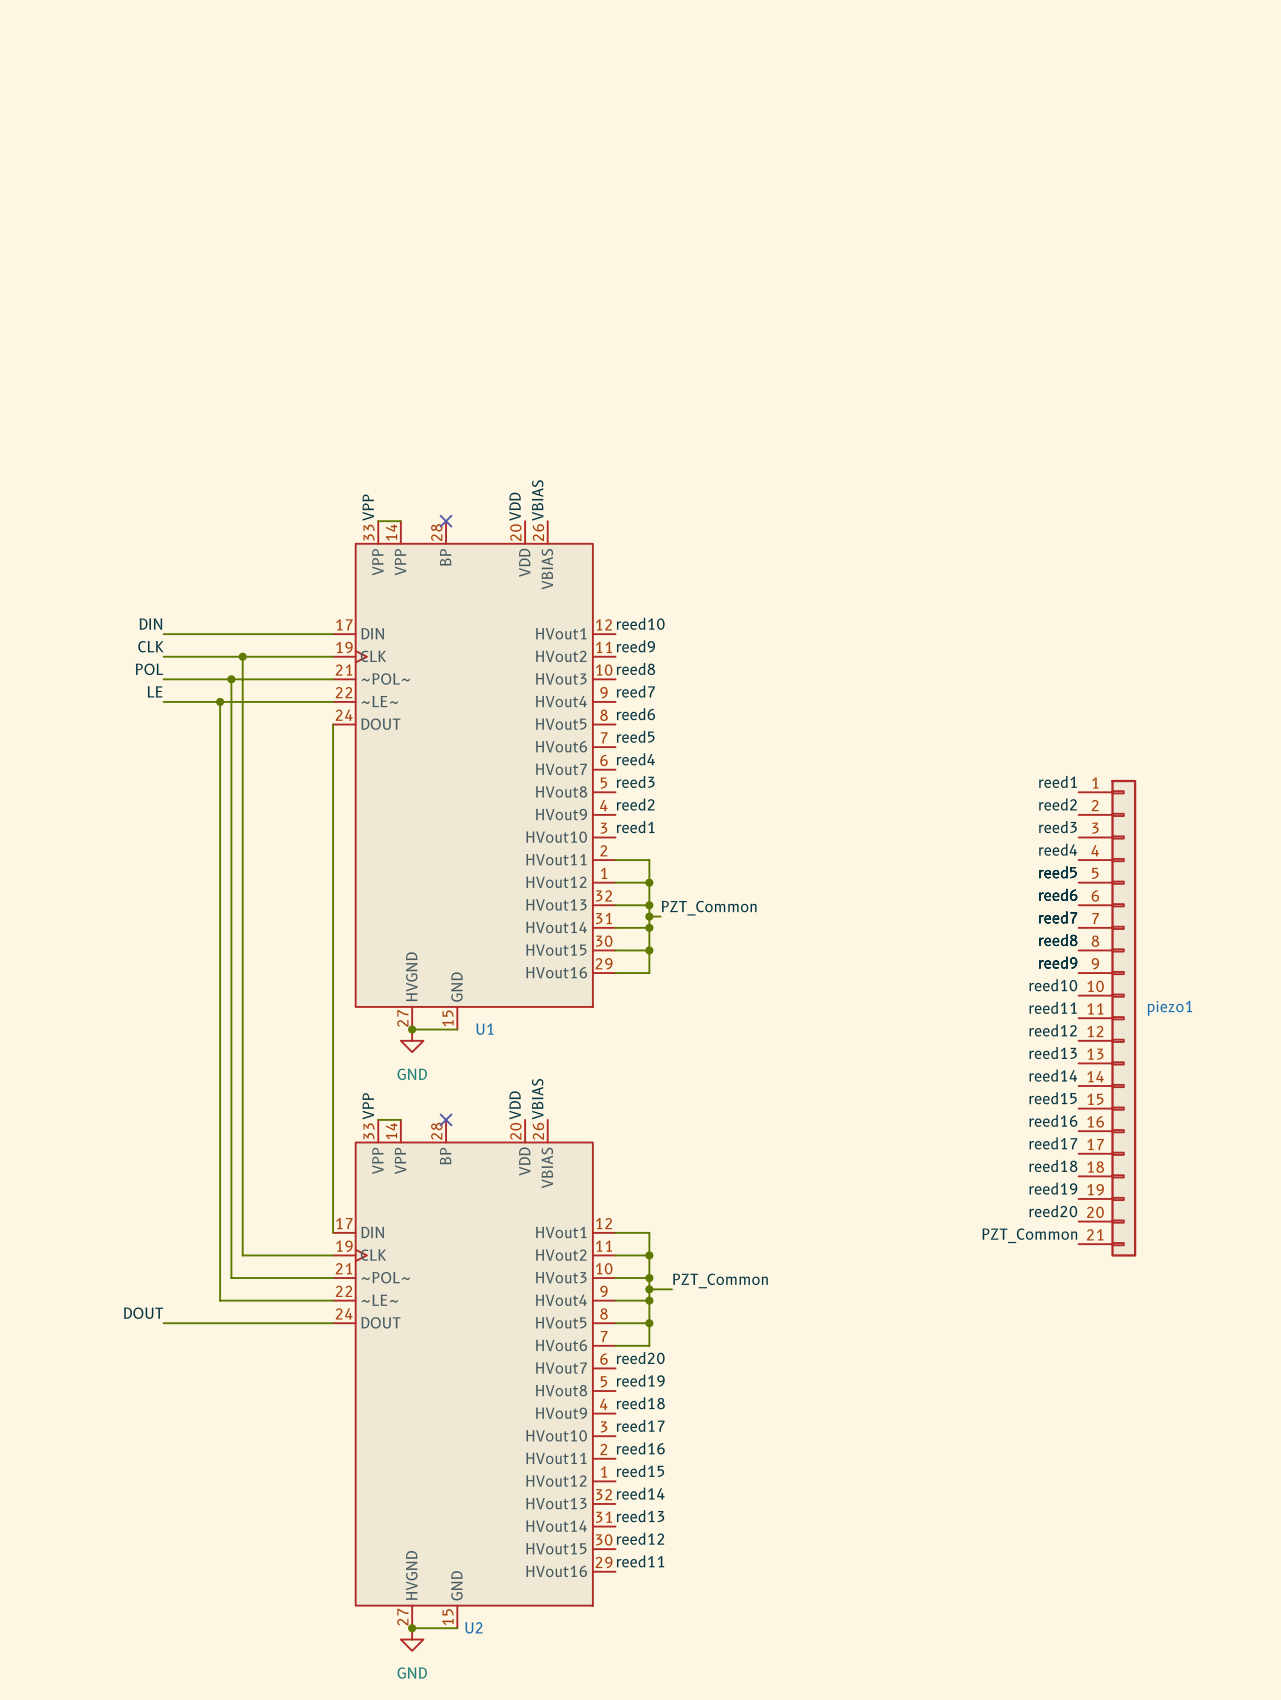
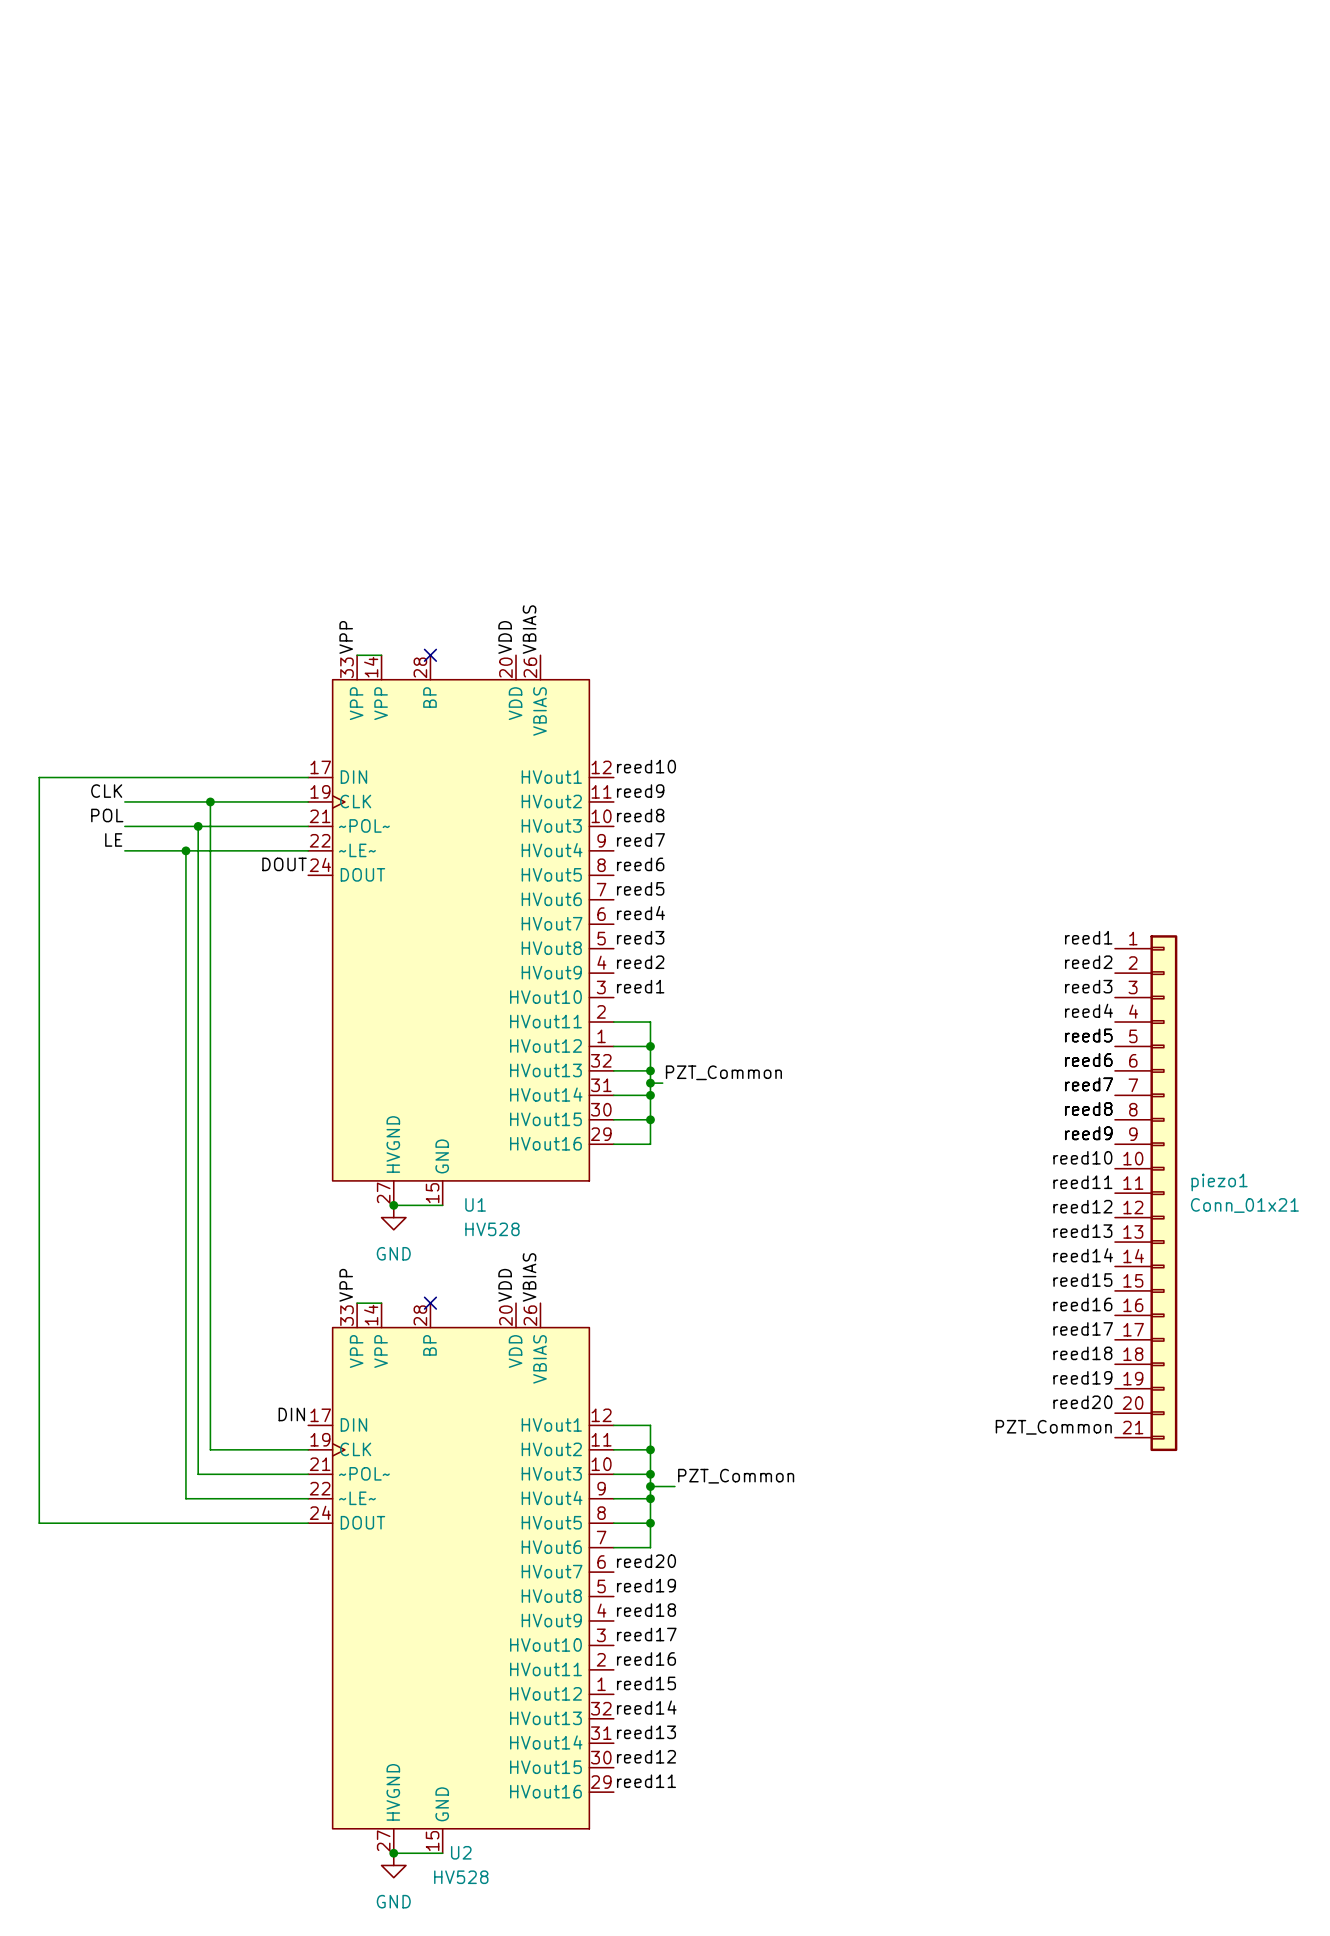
label: DIN (150, 624) -> none
wire: none -> (124, 777) (39, 777) (39, 1523) (124, 1523)
label: none -> DOUT (284, 864)
wire: (333, 724) (333, 1232) -> none
piezo1 value: none -> Conn_01x21 (1244, 1205)
U1 value: none -> HV528 (492, 1229)
label: none -> DIN (291, 1414)
label: DOUT (143, 1313) -> none
U2 value: none -> HV528 (461, 1877)

